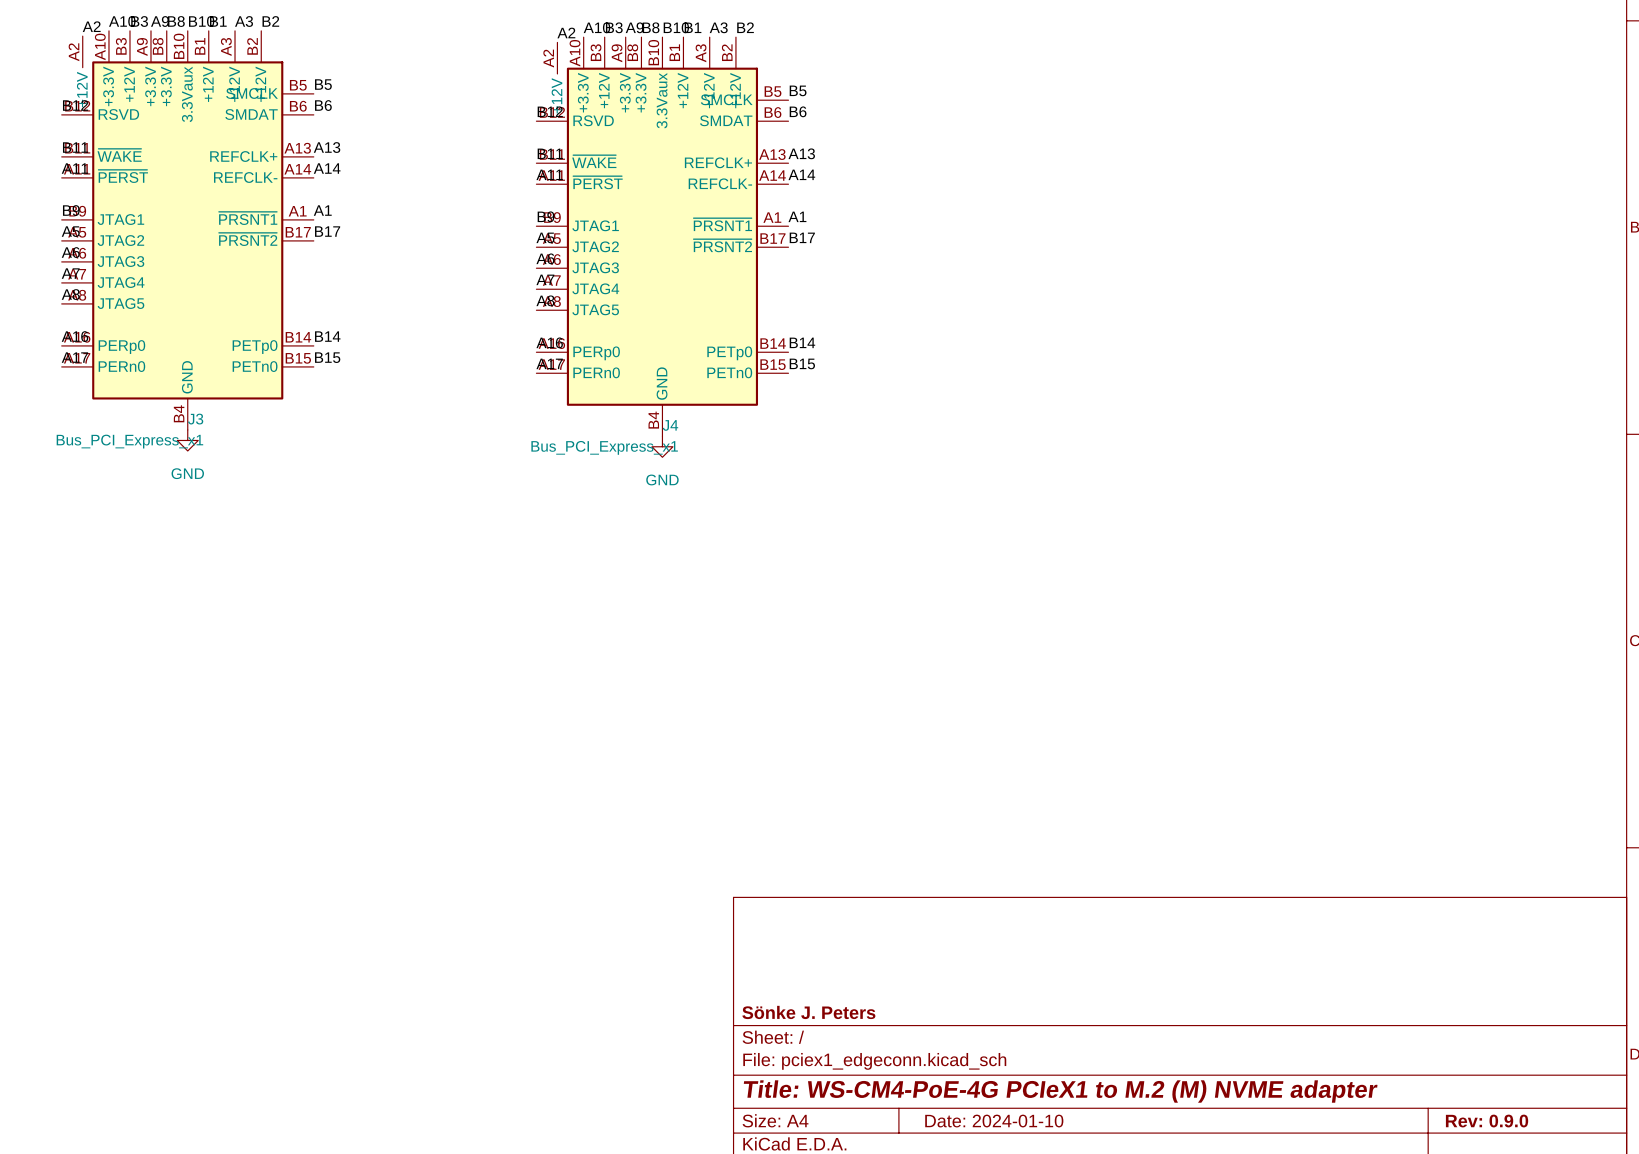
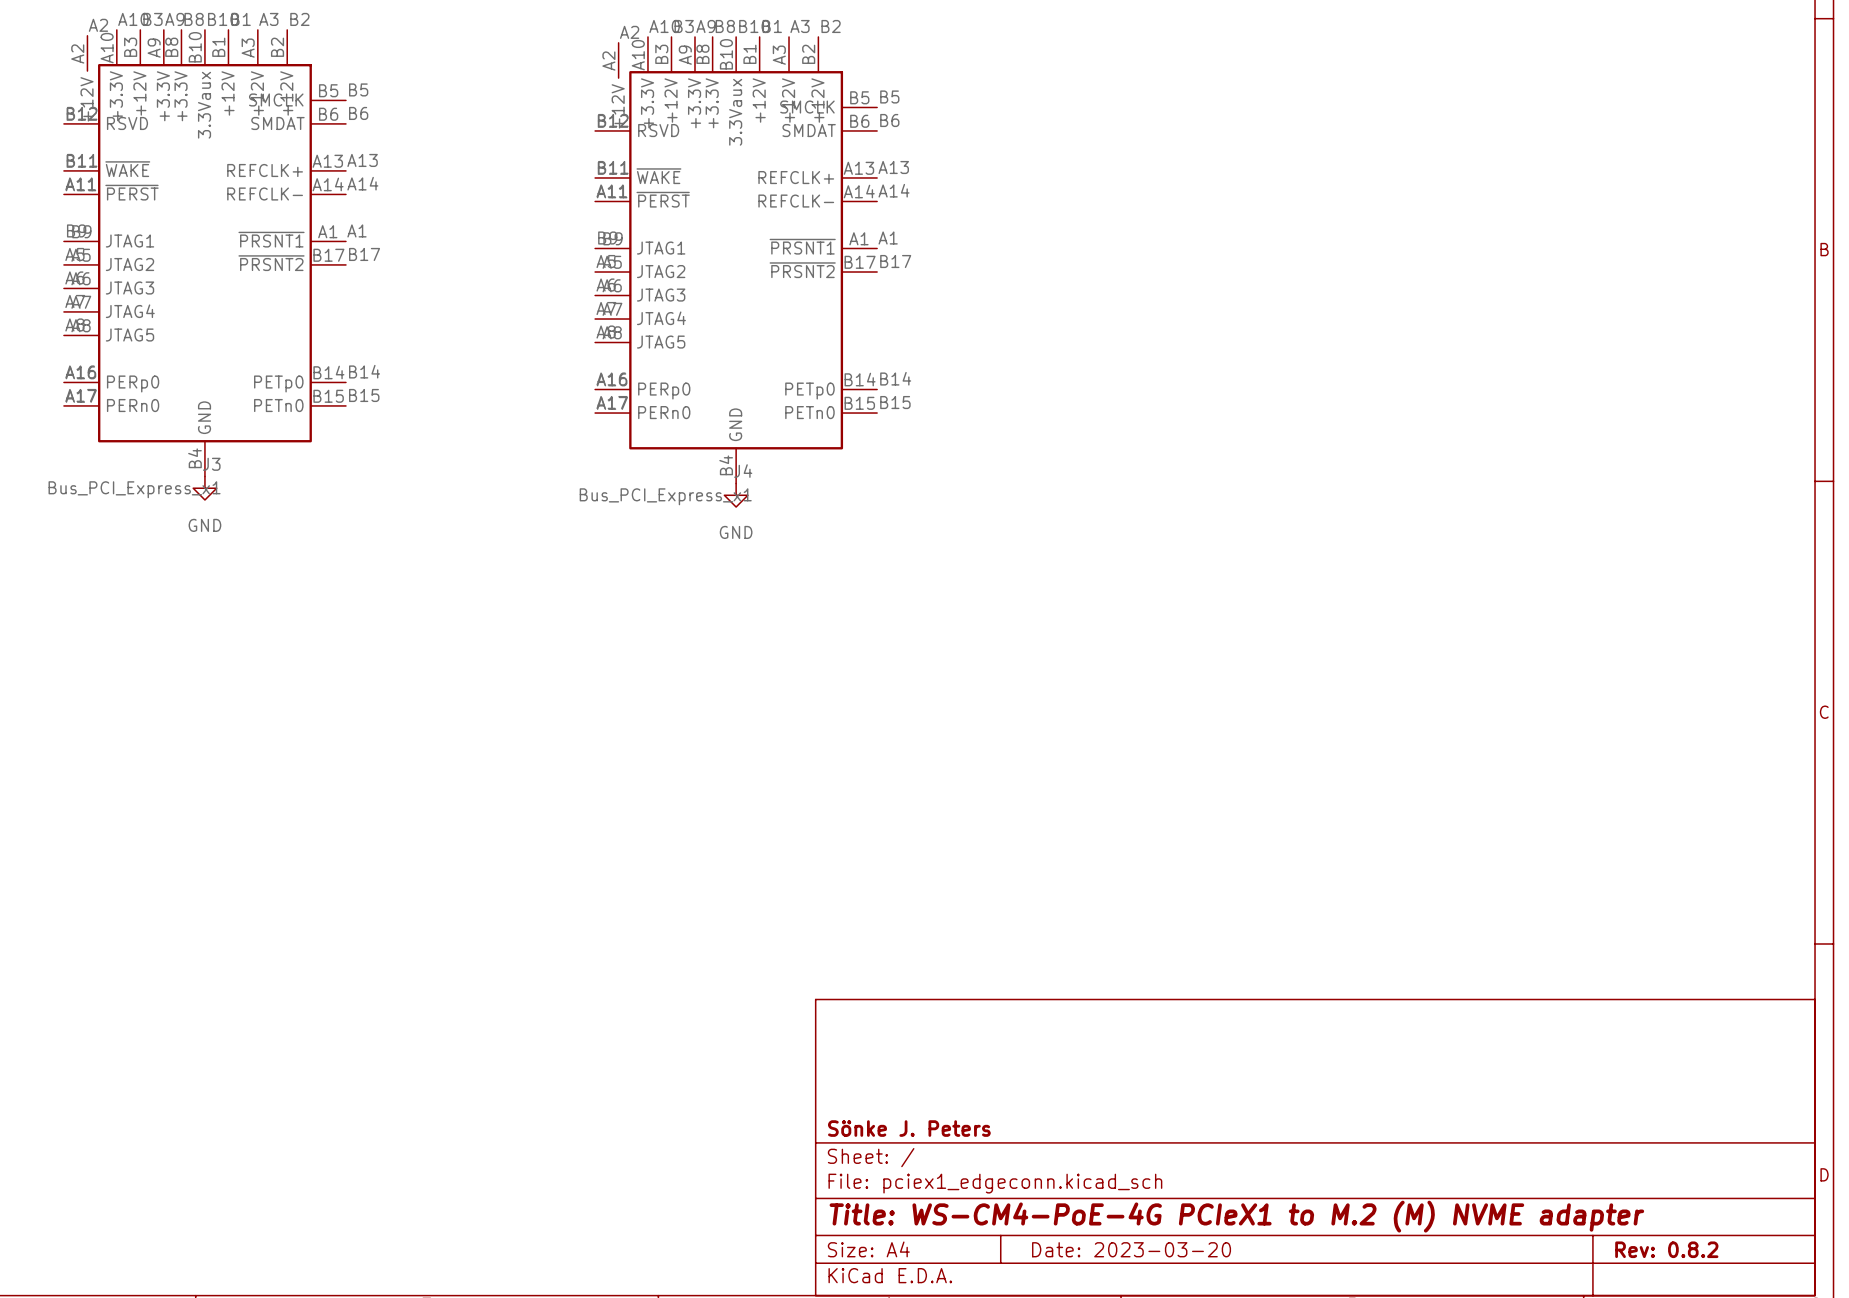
title block: Date: 2024-01-10 (994, 1121) -> Date: 2023-03-20 (1131, 1249)
title block: Rev: 0.9.0 (1487, 1121) -> Rev: 0.8.2 (1666, 1249)

